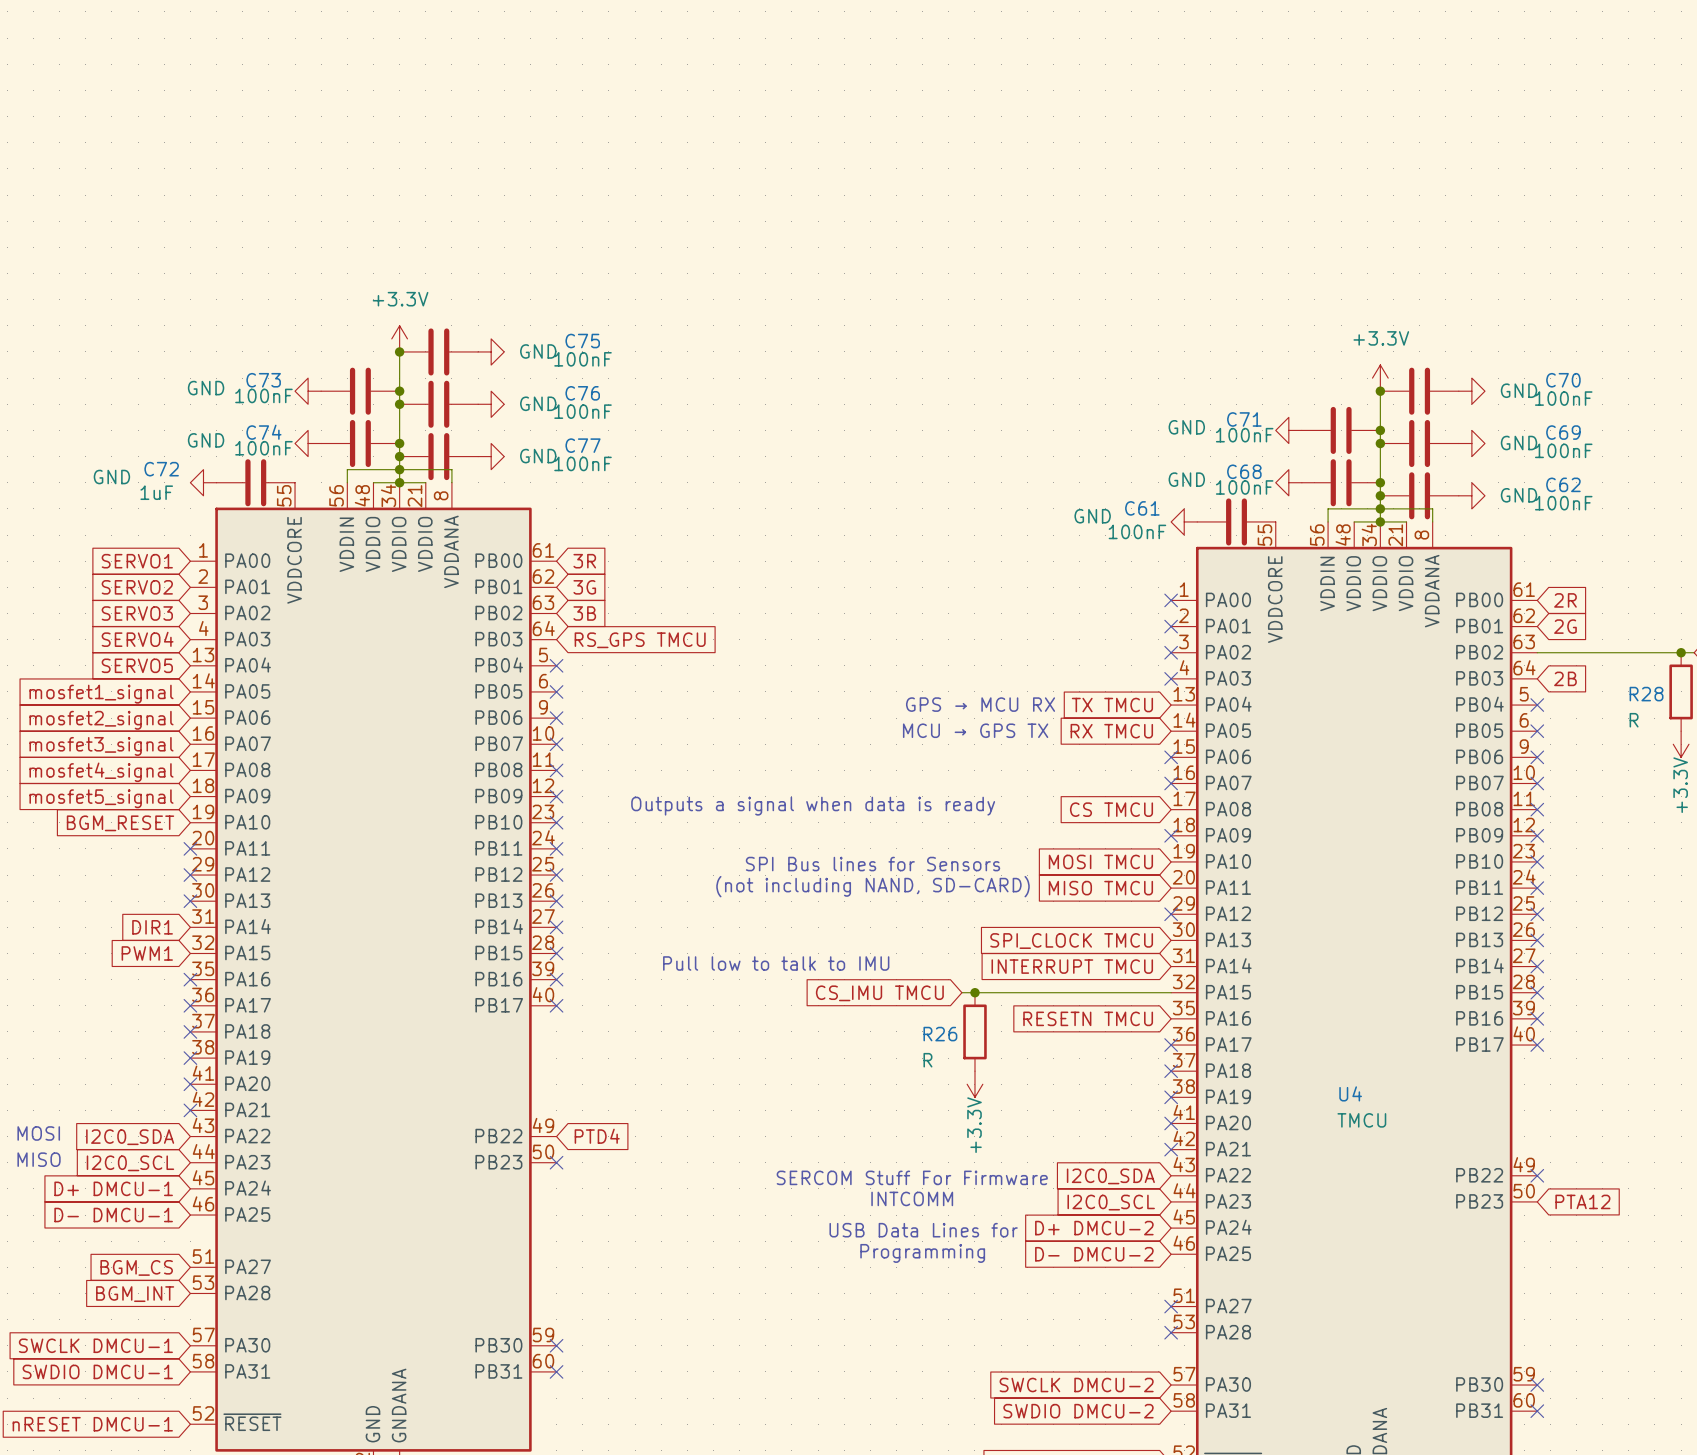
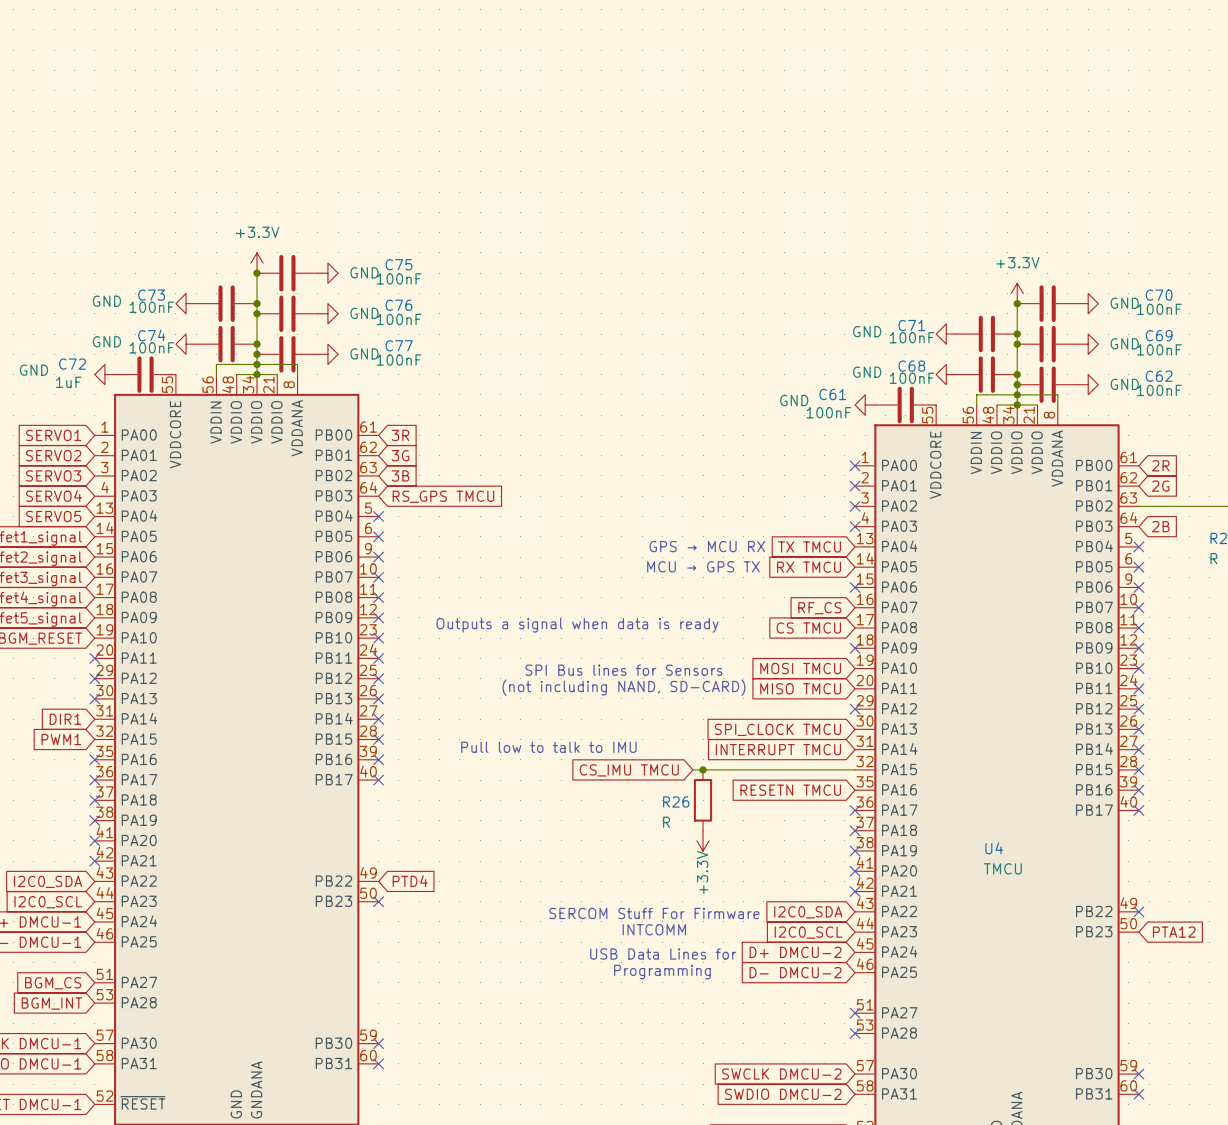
no-connect mark: (1171, 783) -> none
global label: none -> RF_CS (819, 608)

